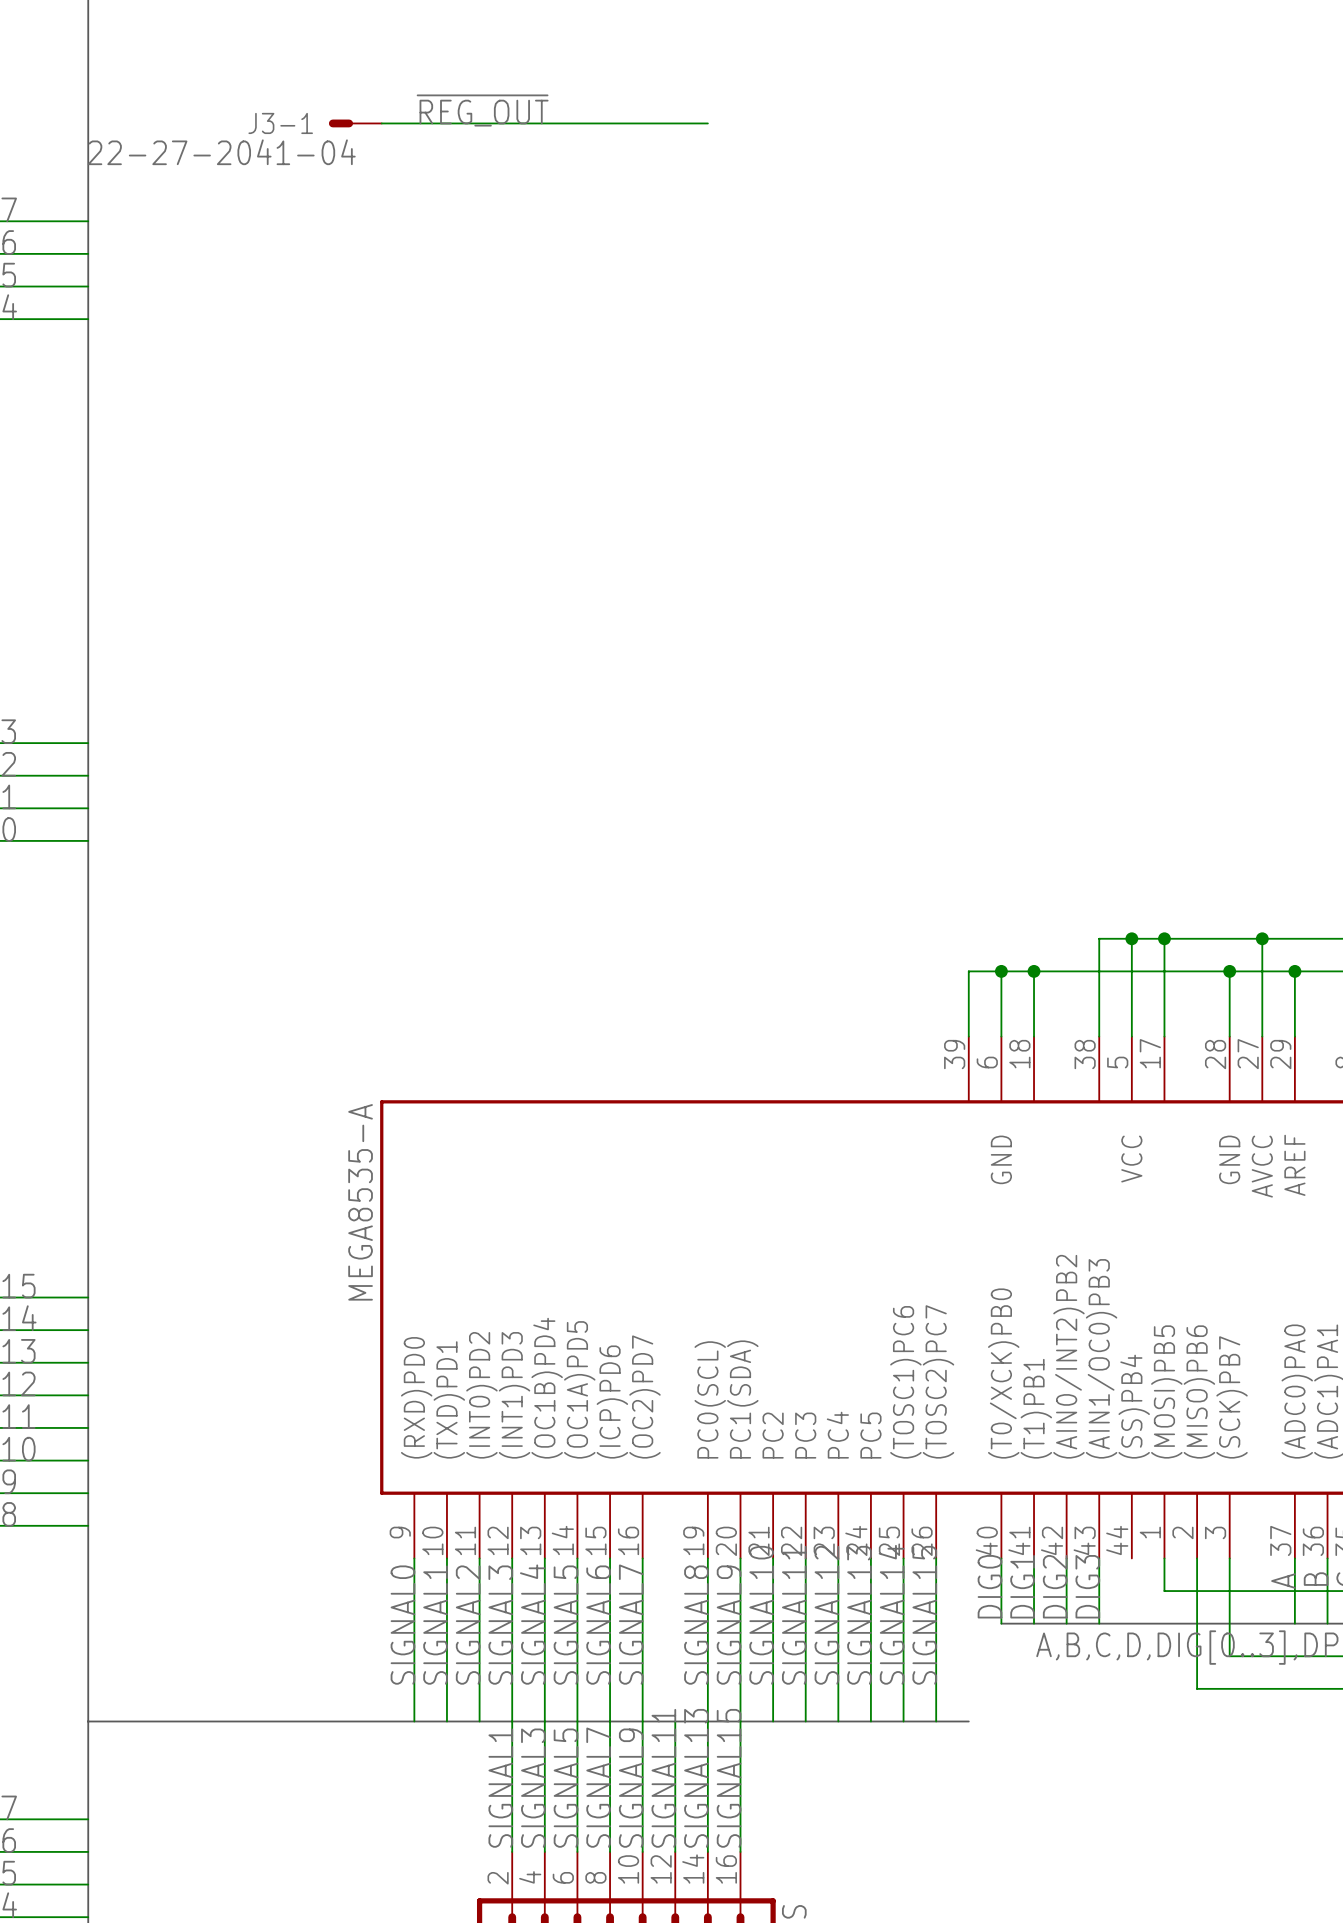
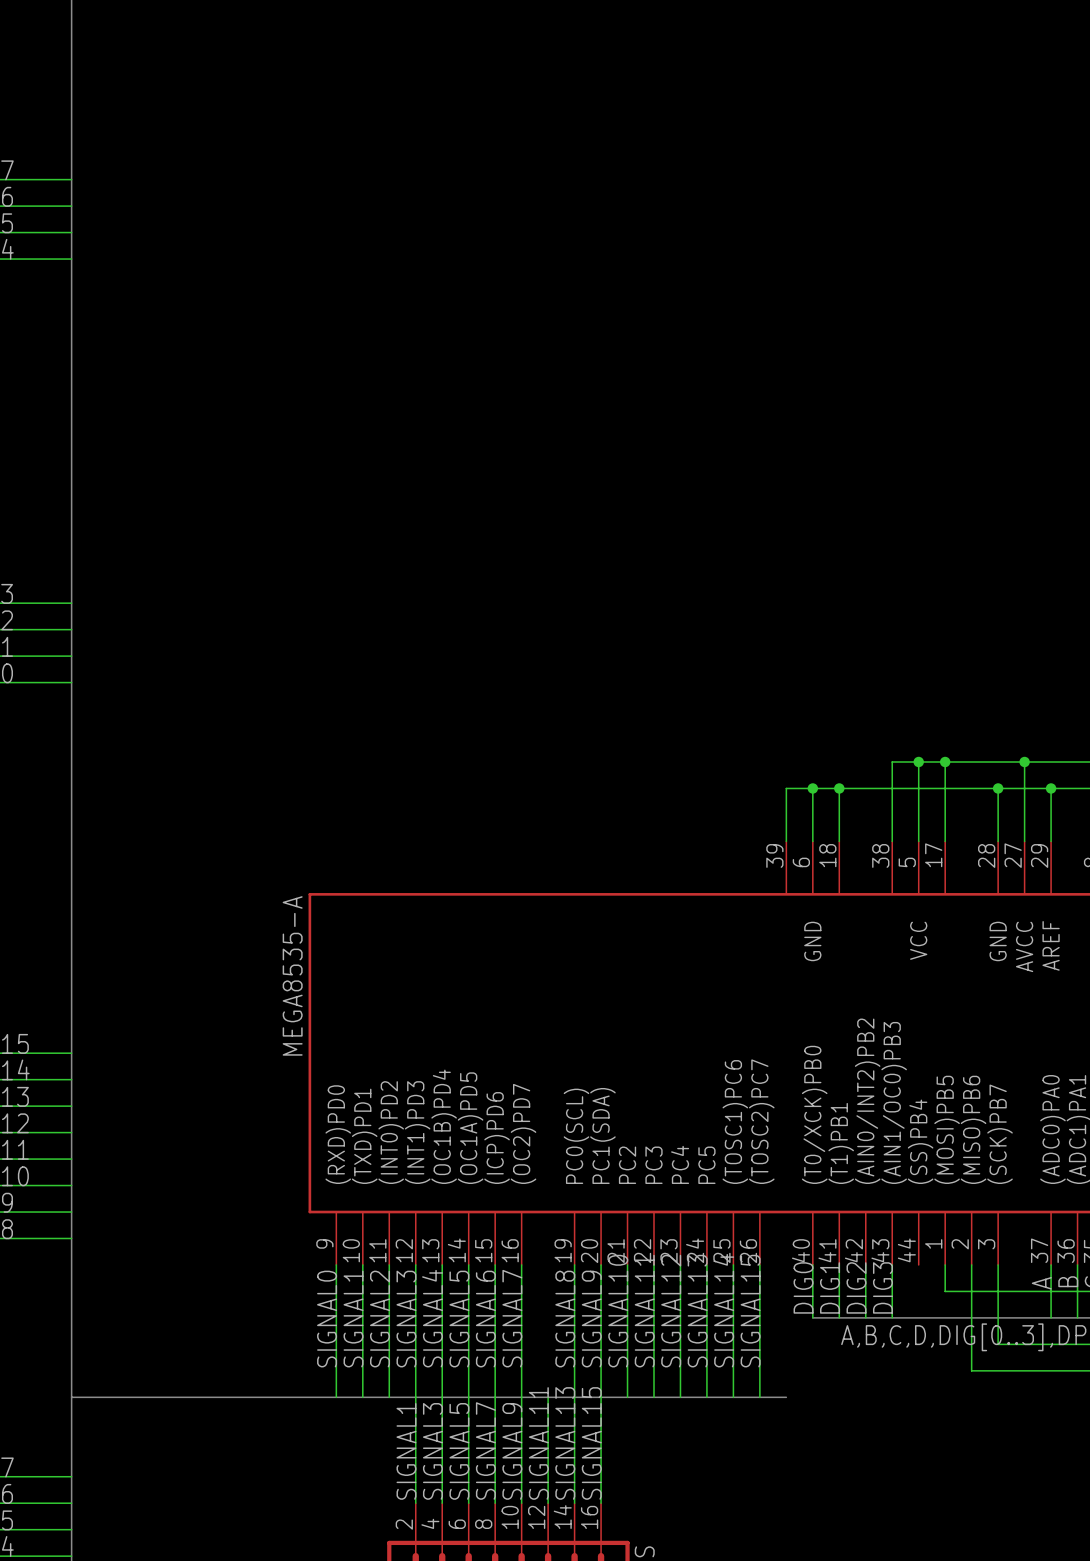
label: ~{REG_OUT} (482, 110) -> none
J3-1: 22-27-2041-04 (355, 123) -> none
wire: (381, 123) (707, 123) -> none

